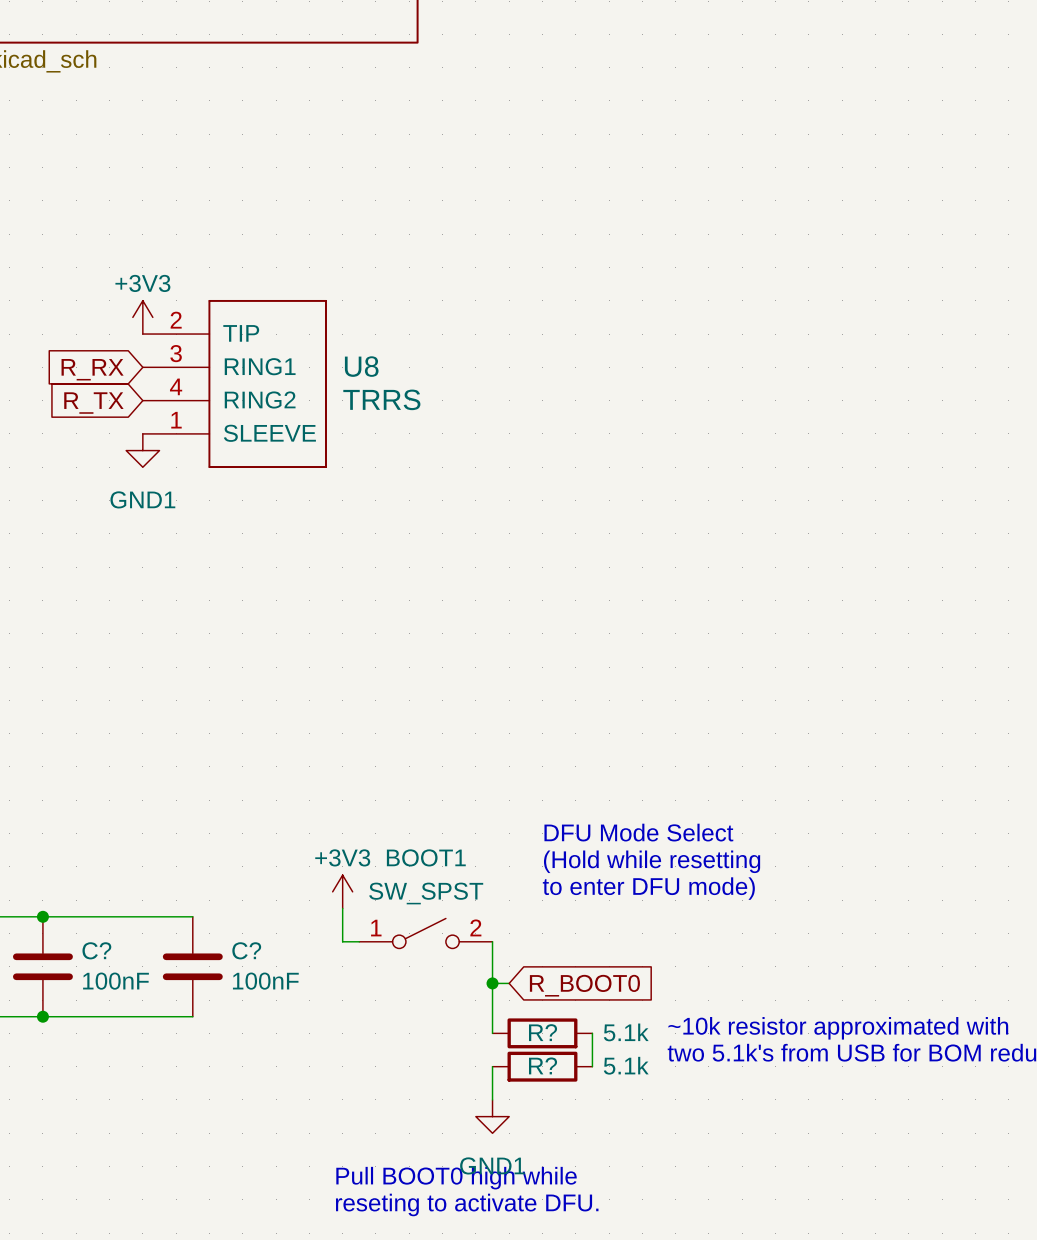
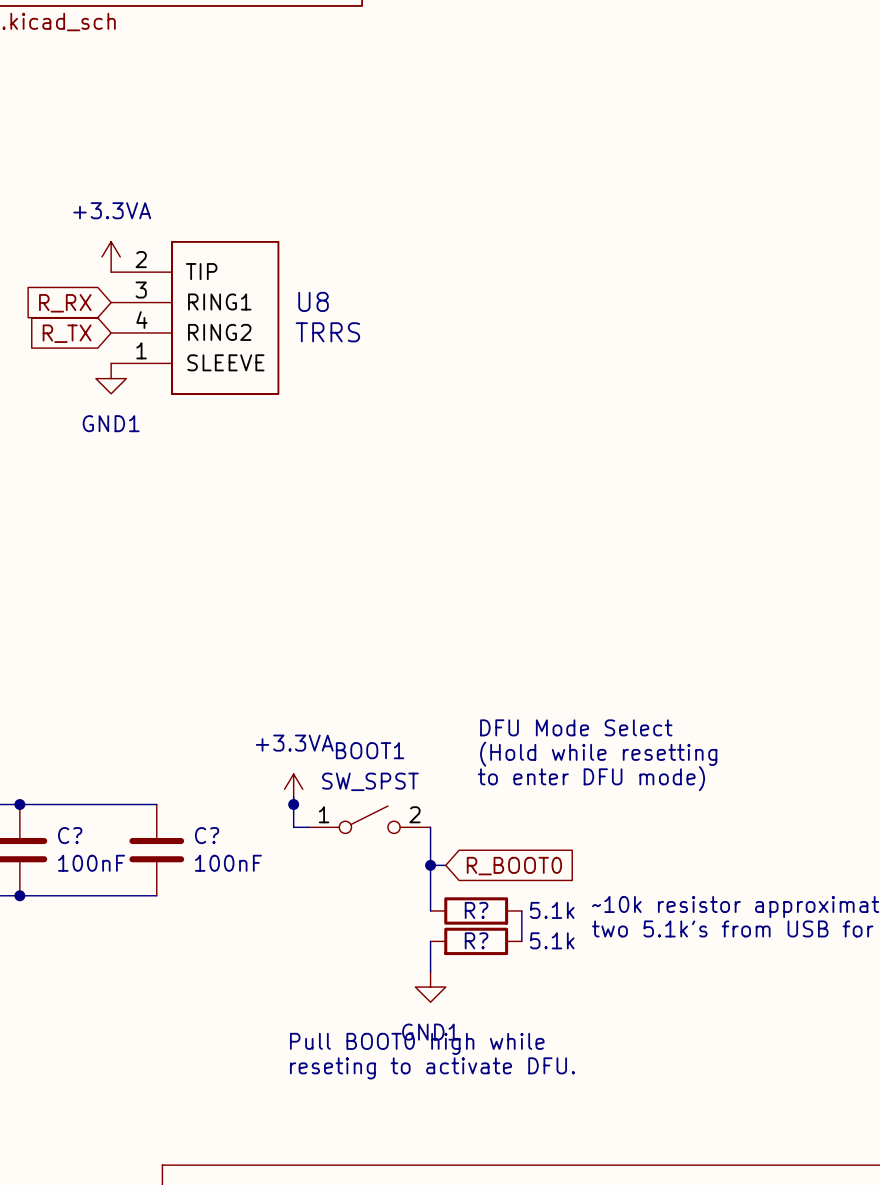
power symbol: +3V3 (142, 317) -> +3.3VA (111, 256)
power symbol: +3V3 (342, 891) -> +3.3VA (293, 789)
junction: none -> (293, 804)

